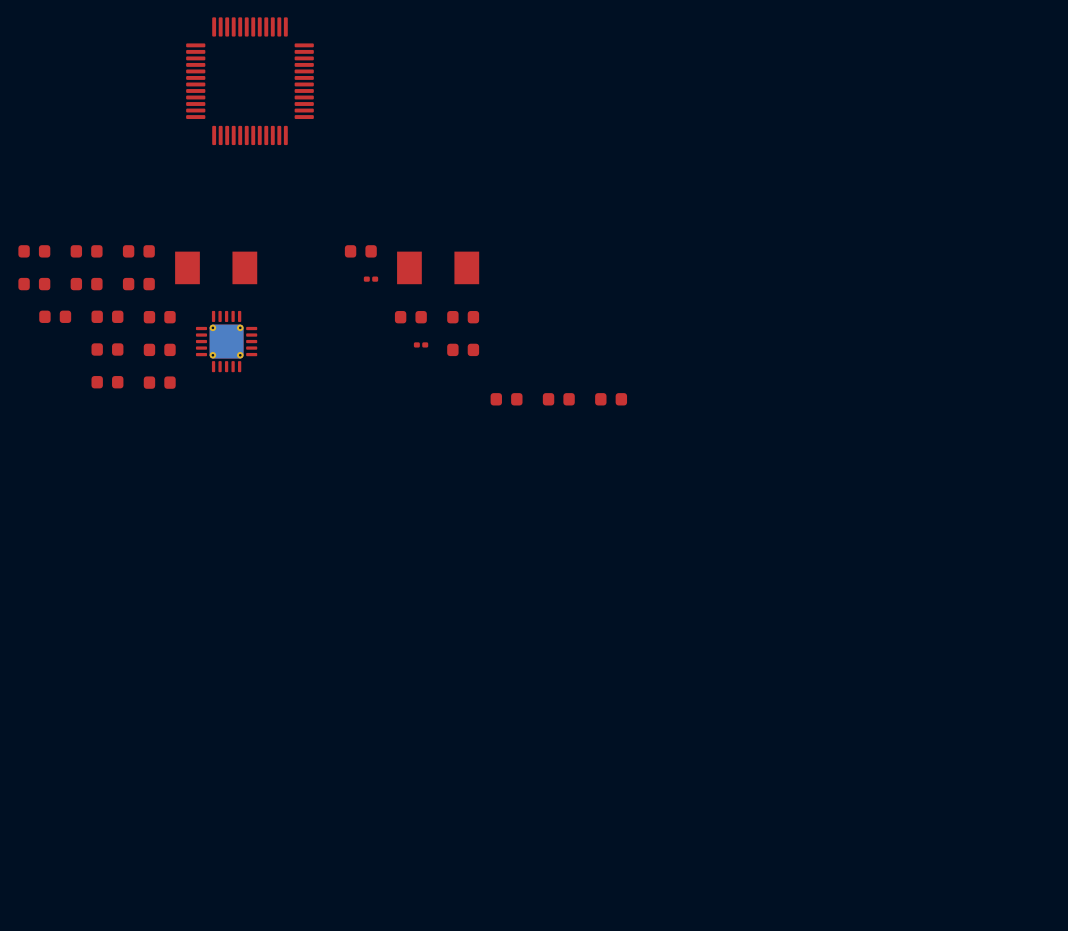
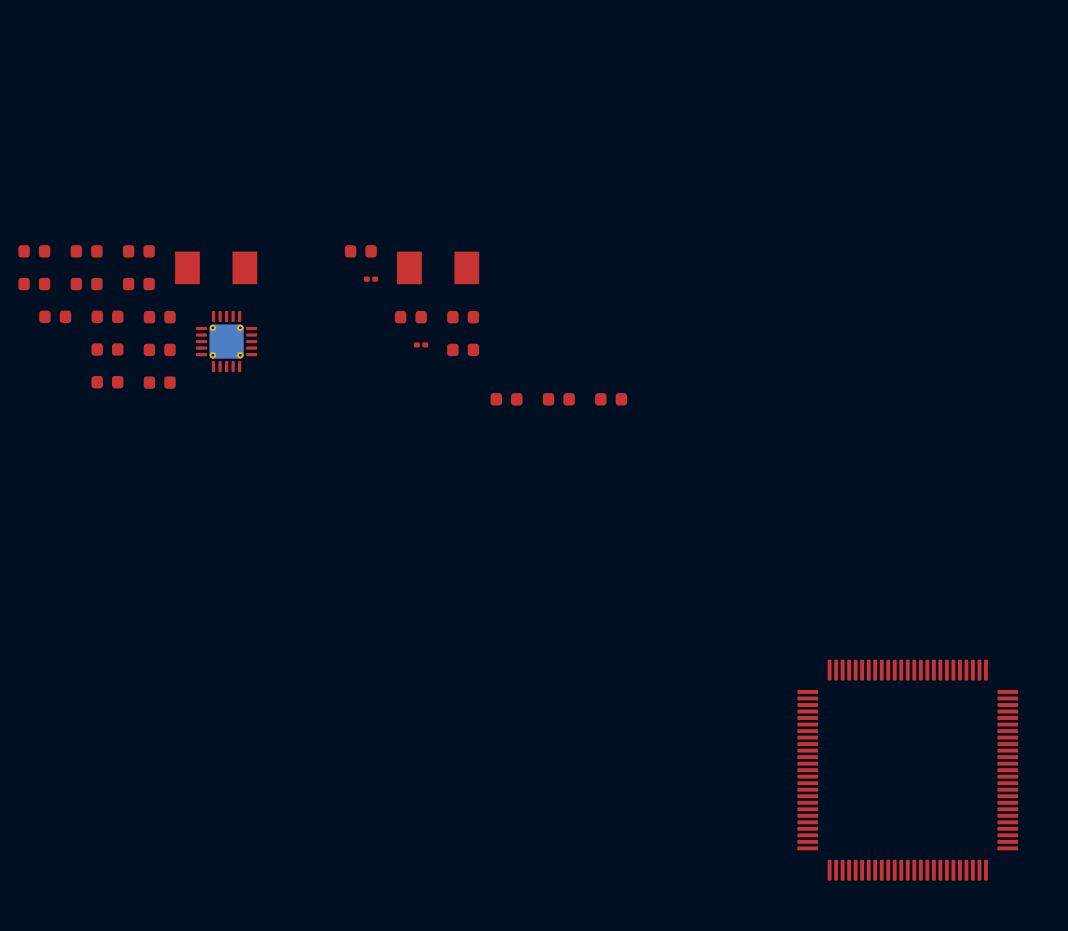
part: (249, 81) -> none
part: none -> (907, 770)

